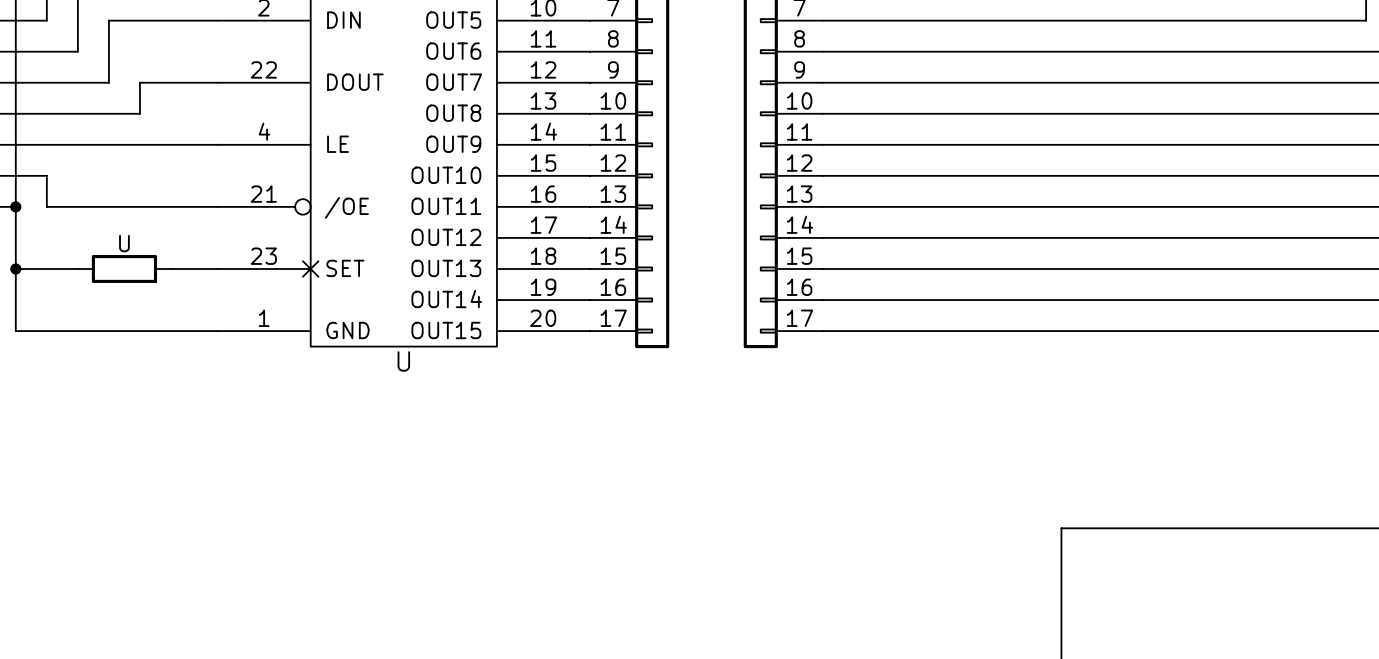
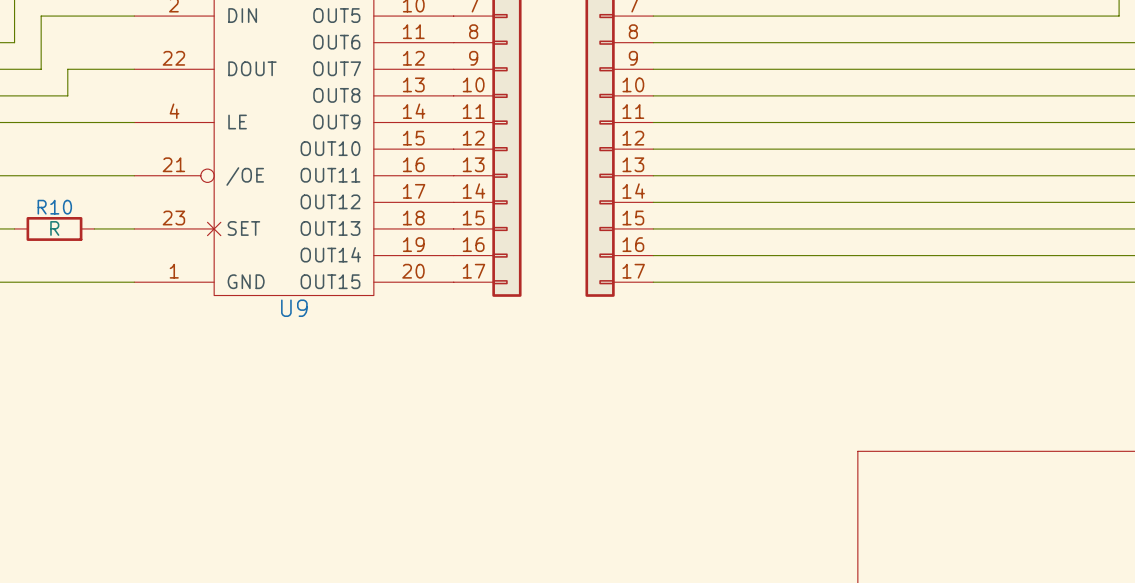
U name: U (124, 243) -> R10 (54, 207)
U value: none -> R (54, 228)
U name: U (403, 361) -> U9 (294, 308)

